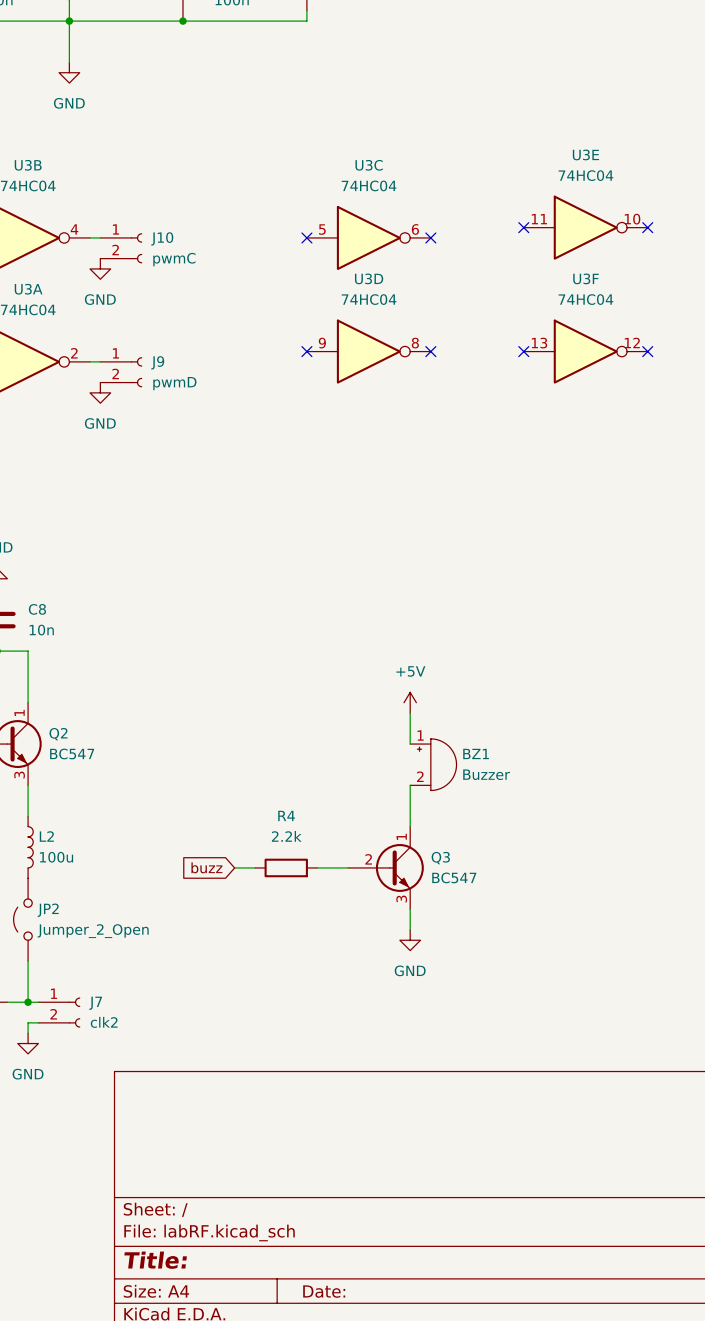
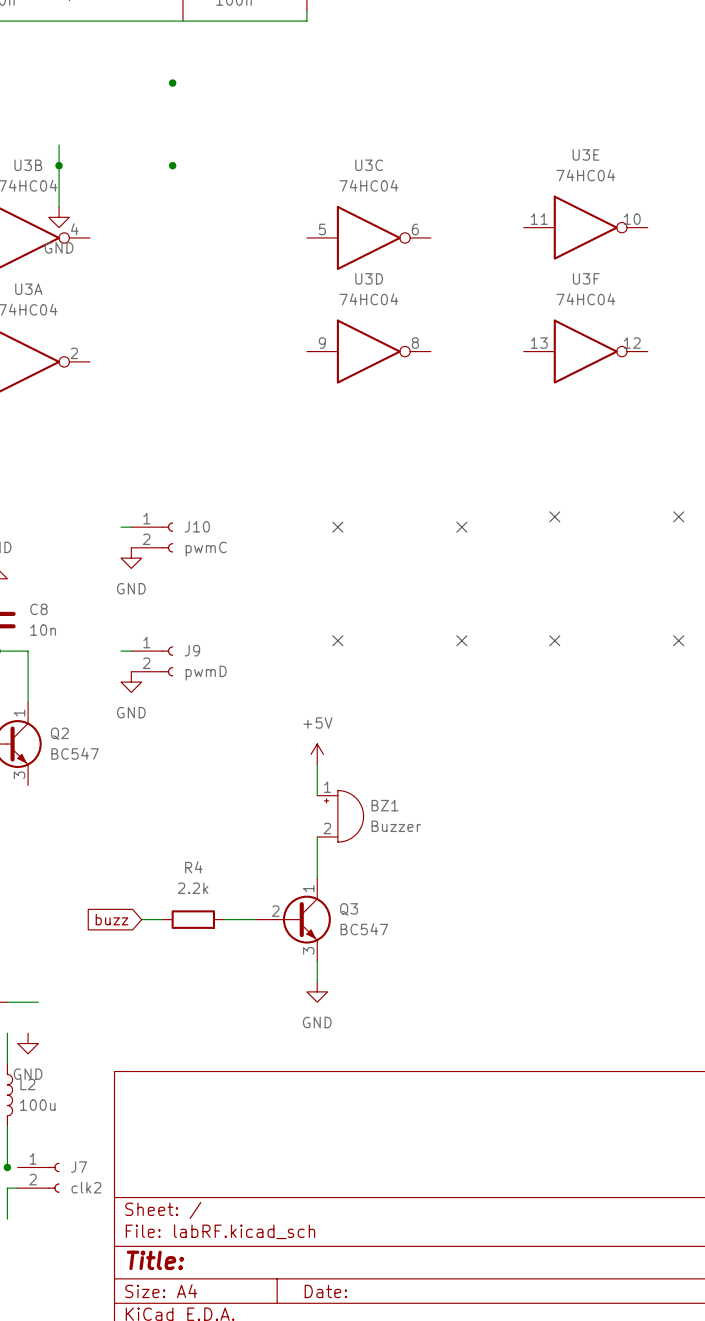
wire: (69, 0) (69, 62) -> (59, 145) (59, 206)
junction: (69, 21) -> none
junction: (182, 21) -> none
power symbol: GND (69, 72) -> none
junction: none -> (172, 83)
junction: none -> (59, 165)
junction: none -> (172, 165)
no-connect mark: (523, 227) -> none
no-connect mark: (647, 227) -> none
wire: (90, 237) (100, 237) -> none
no-connect mark: (306, 237) -> none
no-connect mark: (430, 237) -> none
J10 position: (121, 248) -> (152, 537)
power symbol position: GND (100, 268) -> GND (59, 217)
no-connect mark: (306, 351) -> none
no-connect mark: (430, 351) -> none
no-connect mark: (523, 351) -> none
no-connect mark: (647, 351) -> none
wire: (90, 361) (100, 361) -> (121, 527) (131, 527)
J9 position: (121, 372) -> (152, 661)
power symbol: GND (100, 392) -> none
no-connect mark: none -> (554, 516)
no-connect mark: none -> (678, 516)
no-connect mark: none -> (337, 527)
no-connect mark: none -> (461, 527)
power symbol: none -> GND (131, 558)
no-connect mark: none -> (337, 640)
no-connect mark: none -> (461, 640)
no-connect mark: none -> (554, 640)
no-connect mark: none -> (678, 640)
wire: none -> (121, 651) (131, 651)
power symbol: none -> GND (131, 682)
power symbol position: +5V (410, 702) -> +5V (317, 754)
wire: (410, 713) (410, 744) -> (317, 764) (317, 795)
BZ1 position: (433, 764) -> (340, 816)
wire: (28, 785) (28, 816) -> none
wire: (410, 785) (410, 826) -> (317, 836) (317, 878)
L2 position: (30, 847) -> (9, 1095)
global label position: buzz (206, 867) -> buzz (112, 919)
wire: (234, 867) (255, 867) -> (141, 919) (162, 919)
R4 position: (286, 867) -> (193, 919)
wire: (317, 867) (348, 867) -> (224, 919) (255, 919)
Q3 position: (386, 867) -> (293, 919)
wire: (410, 909) (410, 929) -> (317, 960) (317, 981)
JP2: Jumper_2_Open (22, 919) -> none
power symbol position: GND (410, 940) -> GND (317, 991)
wire: (28, 960) (28, 1002) -> (7, 1126) (7, 1167)
junction: (28, 1002) -> none
J7 position: (59, 1012) -> (38, 1177)
wire: (38, 1022) (28, 1022) (28, 1033) -> none
wire: none -> (7, 1033) (7, 1064)
junction: none -> (7, 1167)
wire: none -> (17, 1188) (7, 1188) (7, 1219)

